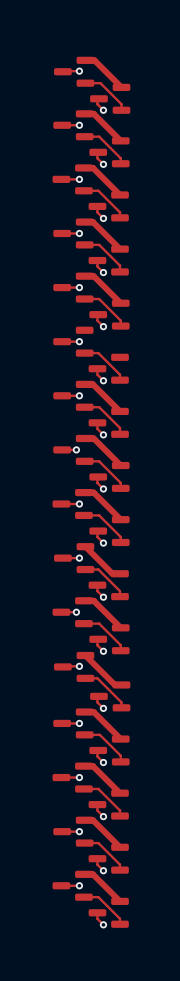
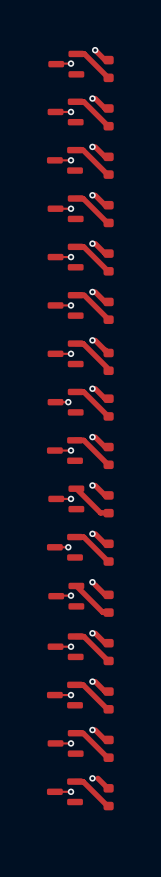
top track: none -> (95, 50) (105, 60)
via: none -> (95, 50)
part: none -> (108, 68)
top track: (85, 83) (100, 83) (121, 104) (121, 110) -> none
top track: (97, 98) (97, 104) (103, 110) -> none
part: (110, 98) -> none
top track: none -> (95, 98) (105, 108)
part: none -> (108, 117)
top track: (84, 136) (99, 136) (120, 158) (120, 163) -> none
top track: (97, 152) (97, 158) (103, 164) -> none
part: (109, 152) -> none
top track: none -> (95, 146) (105, 156)
part: none -> (108, 165)
top track: (83, 190) (98, 190) (120, 212) (120, 217) -> none
top track: (97, 206) (97, 212) (103, 218) -> none
part: (108, 206) -> none
top track: none -> (95, 195) (105, 205)
part: none -> (108, 214)
top track: (84, 244) (99, 244) (120, 265) (120, 271) -> none
top track: (97, 260) (97, 266) (103, 272) -> none
part: (108, 260) -> none
top track: none -> (95, 243) (105, 253)
part: none -> (108, 262)
top track: (84, 299) (99, 299) (120, 320) (120, 326) -> none
top track: (97, 314) (97, 320) (103, 326) -> none
part: (109, 314) -> none
top track: none -> (95, 292) (105, 301)
top track: none -> (75, 295) (84, 295) (108, 319)
part: none -> (108, 310)
top track: (84, 353) (98, 353) (120, 374) (120, 380) -> none
top track: (97, 368) (97, 374) (103, 380) -> none
part: (108, 368) -> none
top track: none -> (95, 340) (105, 350)
part: none -> (108, 361)
top track: (84, 407) (99, 407) (120, 427) (120, 434) -> none
top track: (97, 422) (97, 428) (103, 434) -> none
part: (108, 422) -> none
top track: none -> (95, 388) (105, 398)
part: none -> (108, 407)
top track: (84, 461) (99, 461) (120, 482) (120, 488) -> none
top track: (97, 476) (97, 482) (103, 488) -> none
part: (109, 476) -> none
top track: none -> (95, 437) (105, 447)
part: none -> (108, 455)
top track: (83, 515) (99, 515) (120, 537) (120, 542) -> none
top track: (97, 531) (97, 537) (103, 543) -> none
part: (109, 531) -> none
top track: none -> (95, 485) (105, 495)
part: none -> (108, 504)
top track: (85, 569) (98, 569) (120, 591) (120, 596) -> none
top track: (97, 585) (97, 591) (103, 597) -> none
part: (108, 585) -> none
top track: none -> (95, 533) (105, 543)
part: none -> (108, 552)
top track: (83, 623) (99, 623) (120, 645) (120, 650) -> none
top track: (97, 639) (97, 645) (103, 651) -> none
part: (109, 639) -> none
top track: none -> (95, 584) (105, 594)
part: none -> (108, 603)
top track: (85, 678) (97, 678) (121, 702) (121, 707) -> none
top track: (97, 696) (97, 702) (103, 708) -> none
part: (110, 696) -> none
top track: none -> (95, 633) (105, 643)
part: none -> (108, 652)
top track: (84, 734) (99, 734) (120, 755) (120, 761) -> none
top track: (97, 750) (97, 756) (103, 762) -> none
part: (109, 750) -> none
top track: none -> (95, 681) (105, 691)
part: none -> (108, 700)
top track: (83, 788) (98, 788) (120, 810) (120, 816) -> none
top track: (97, 804) (97, 810) (103, 816) -> none
part: (108, 804) -> none
top track: none -> (95, 730) (105, 739)
part: none -> (108, 748)
top track: (84, 843) (98, 843) (120, 864) (120, 870) -> none
top track: (97, 858) (97, 864) (103, 870) -> none
part: (108, 858) -> none
top track: none -> (97, 778) (108, 788)
part: none -> (108, 797)
top track: (83, 897) (98, 897) (120, 918) (120, 924) -> none
top track: (97, 912) (97, 918) (103, 924) -> none
part: (108, 912) -> none
via: (103, 924) -> none

